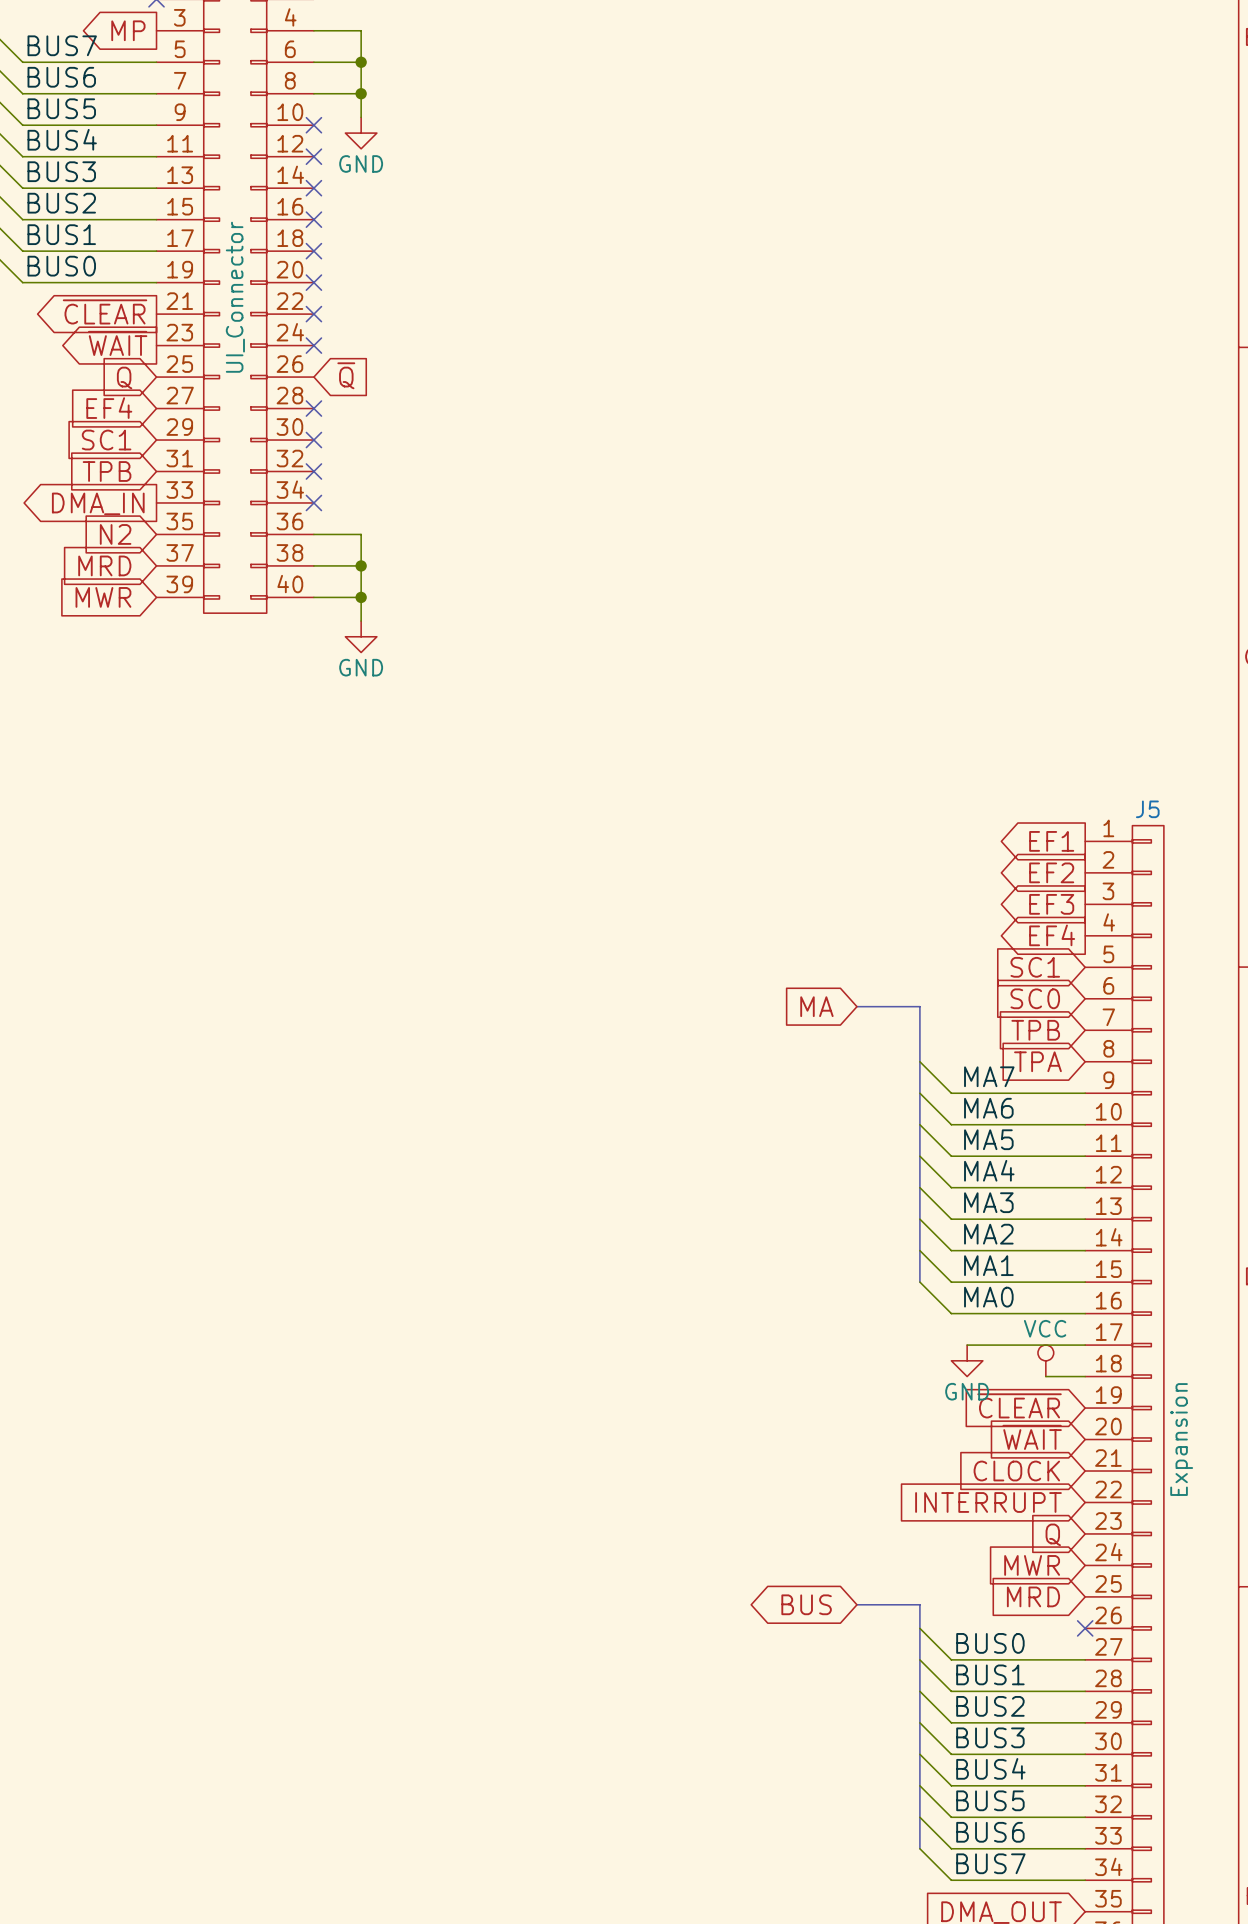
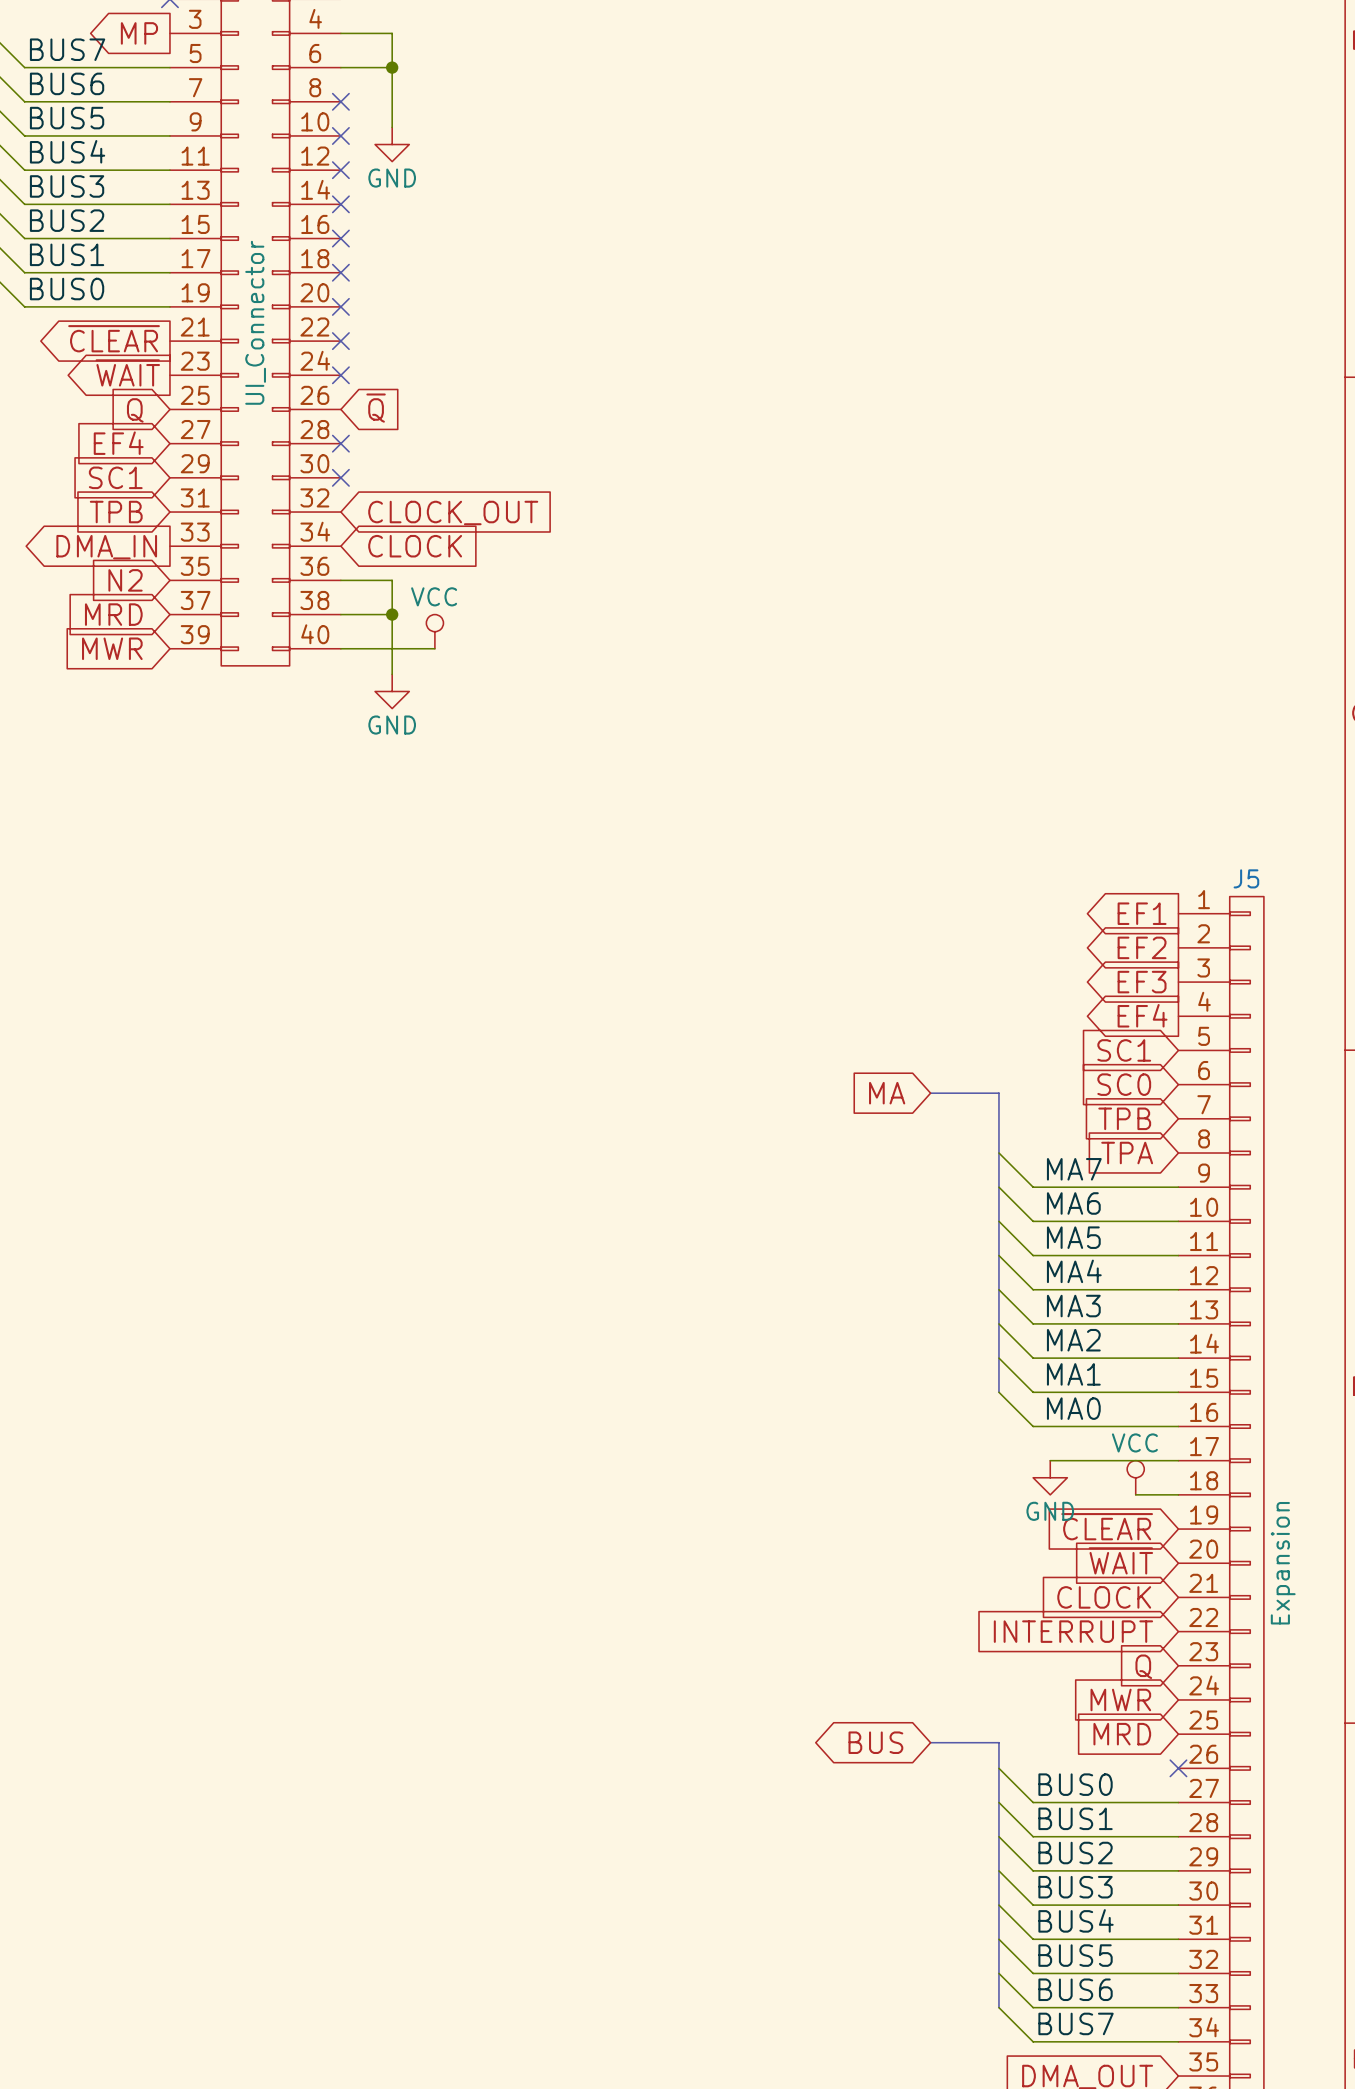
wire: (313, 93) (361, 93) -> none
no-connect mark: none -> (340, 101)
junction: (361, 93) -> none
no-connect mark: (313, 471) -> none
global label: none -> CLOCK_OUT (453, 513)
no-connect mark: (313, 502) -> none
global label: none -> CLOCK (415, 546)
power symbol: none -> VCC (434, 631)
wire: none -> (392, 648) (434, 648)
junction: (361, 597) -> none

